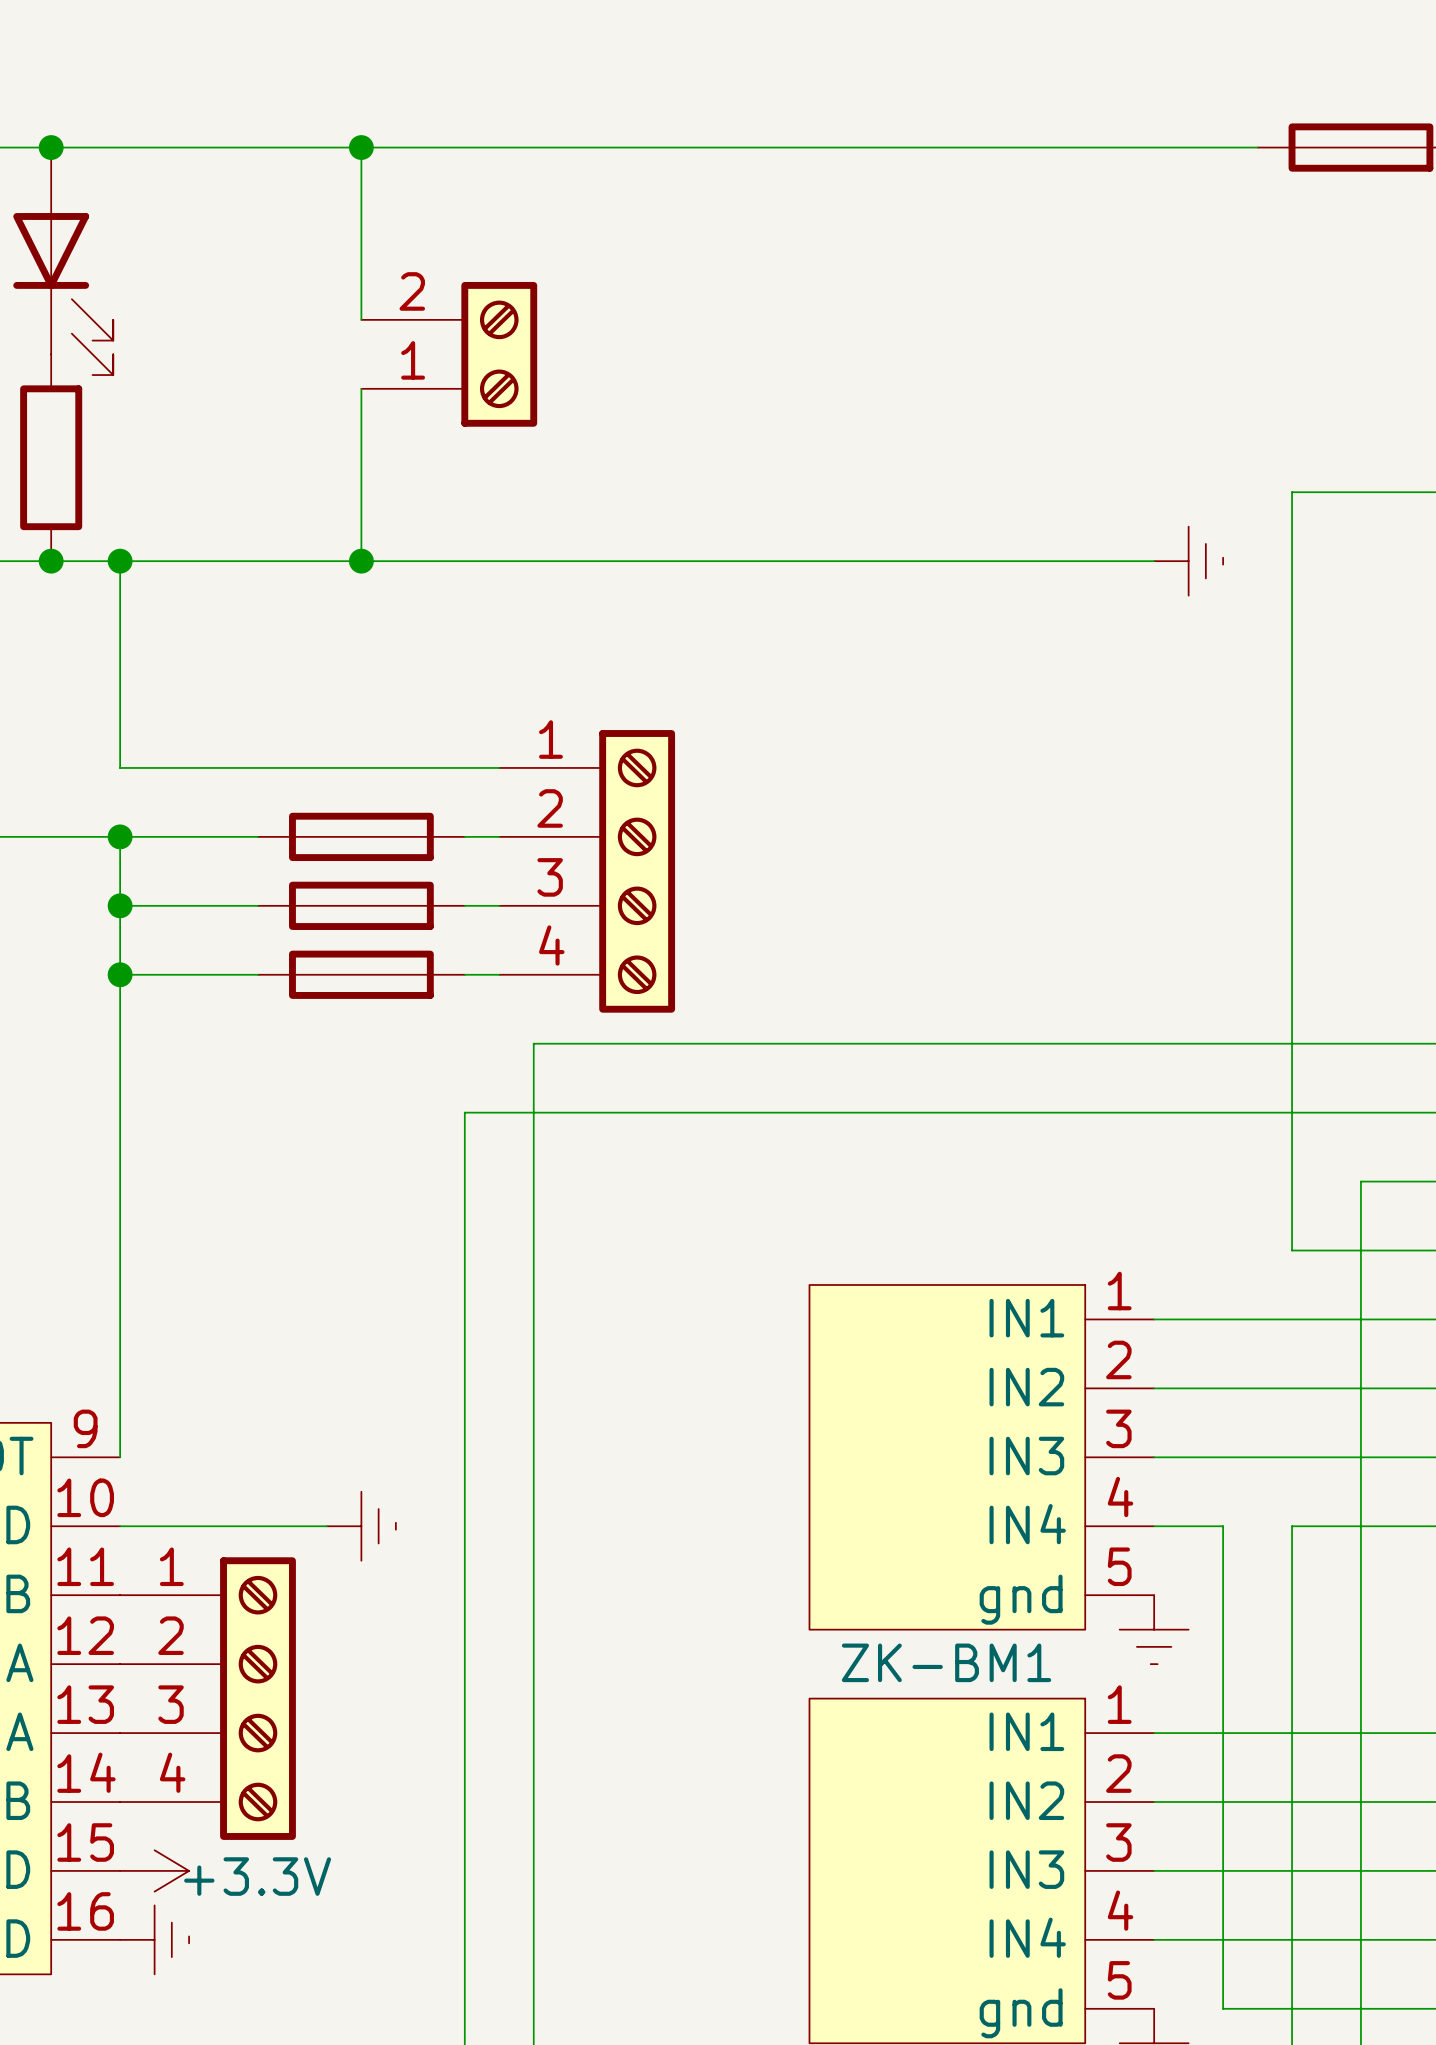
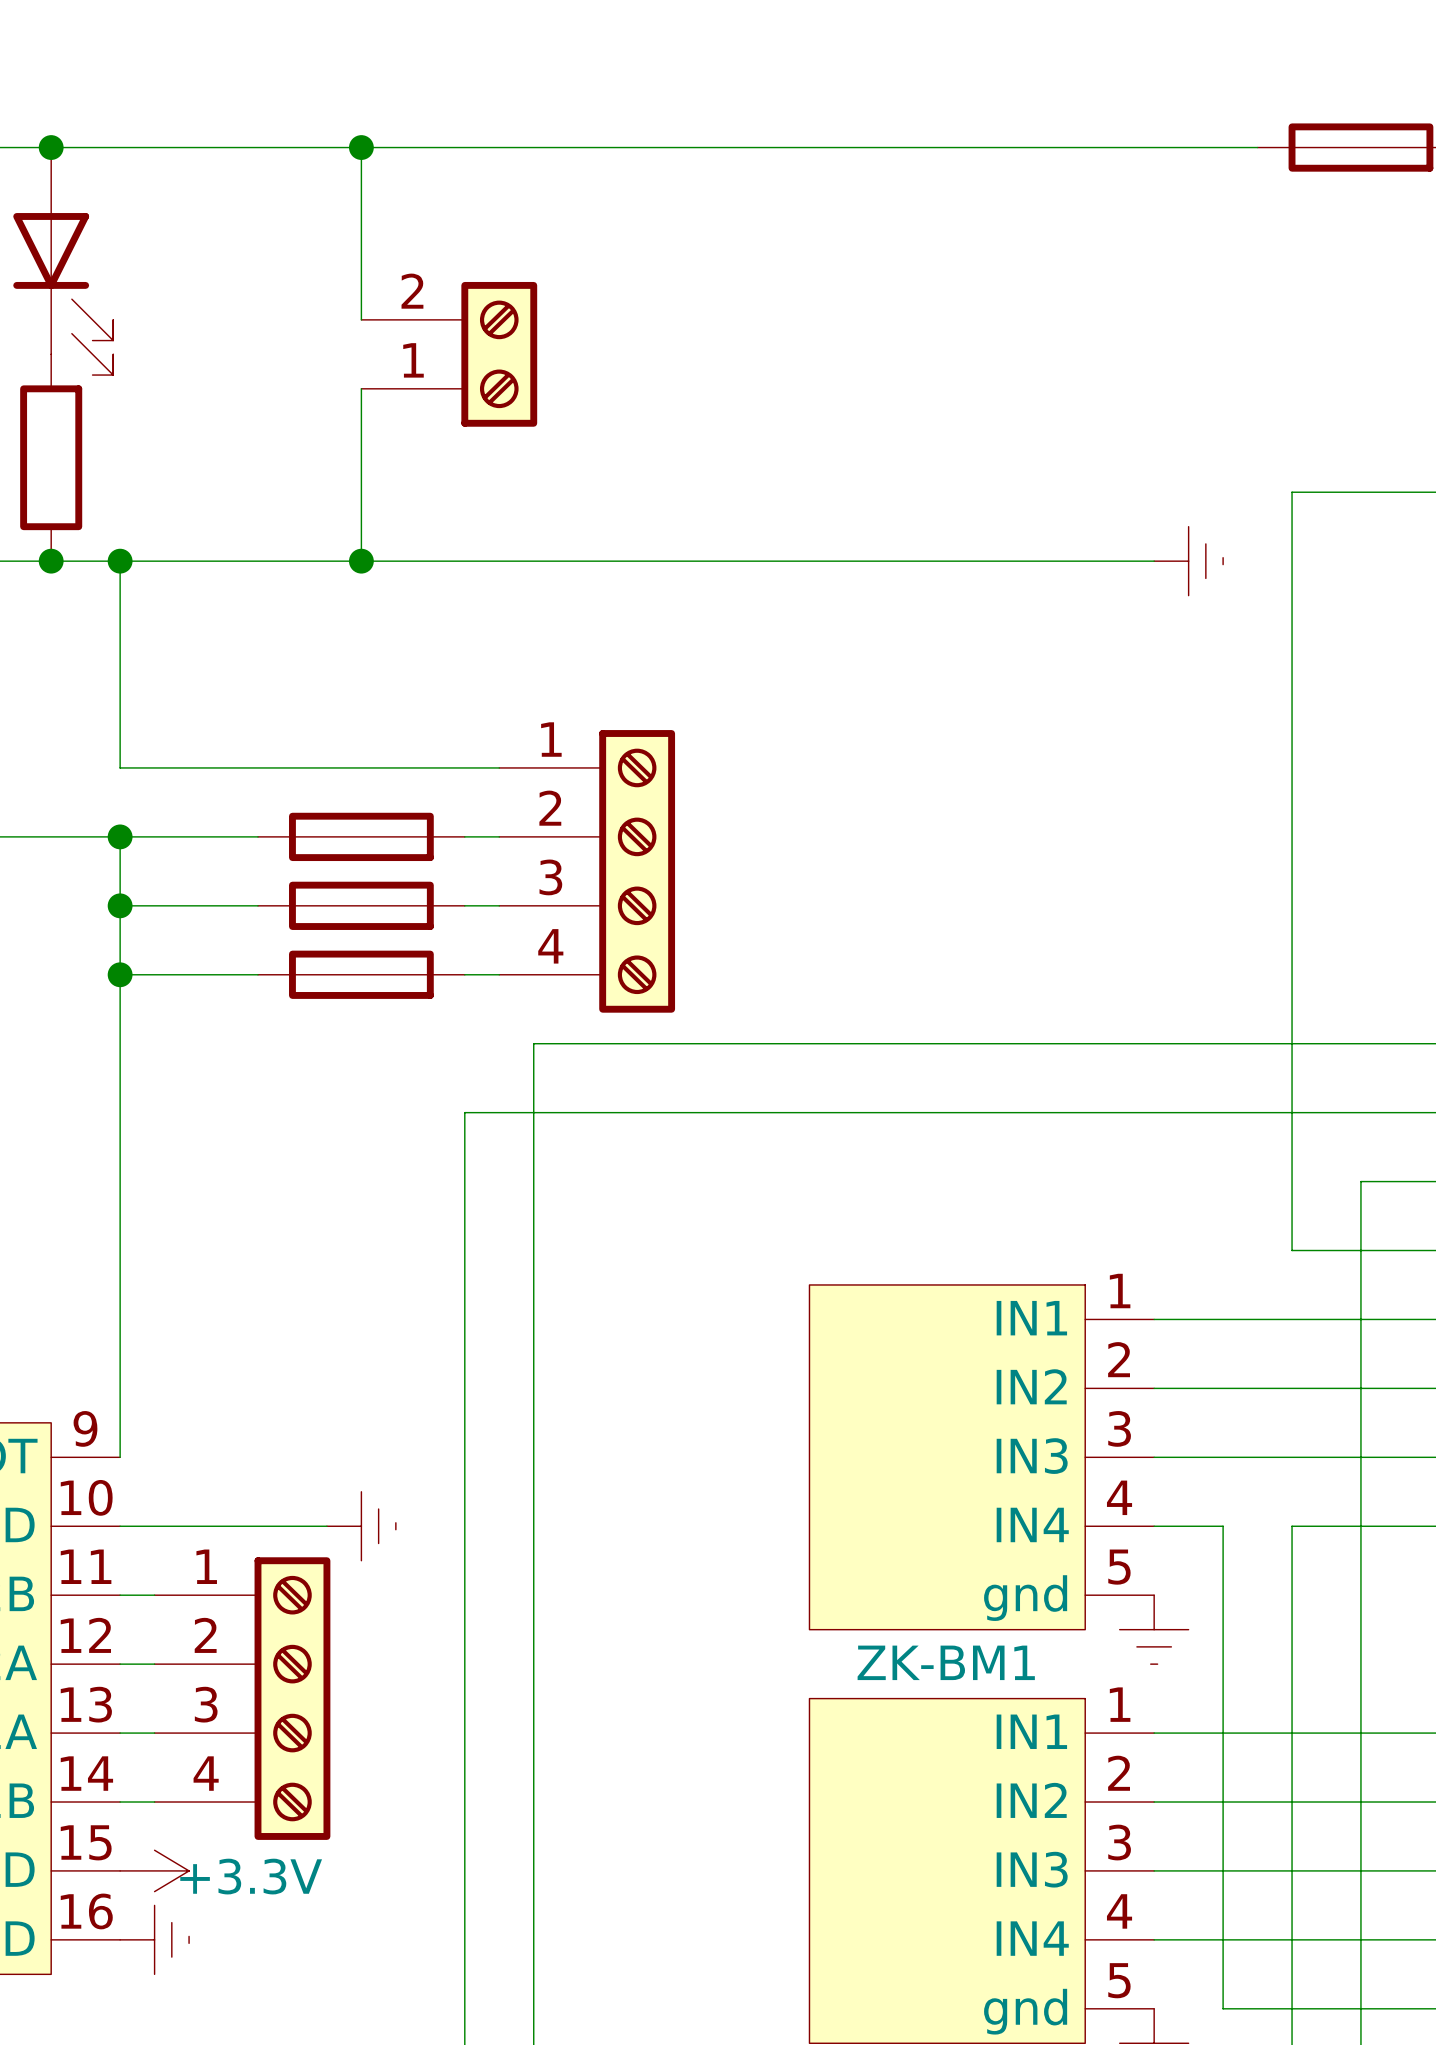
part position: (208, 1698) -> (242, 1698)

